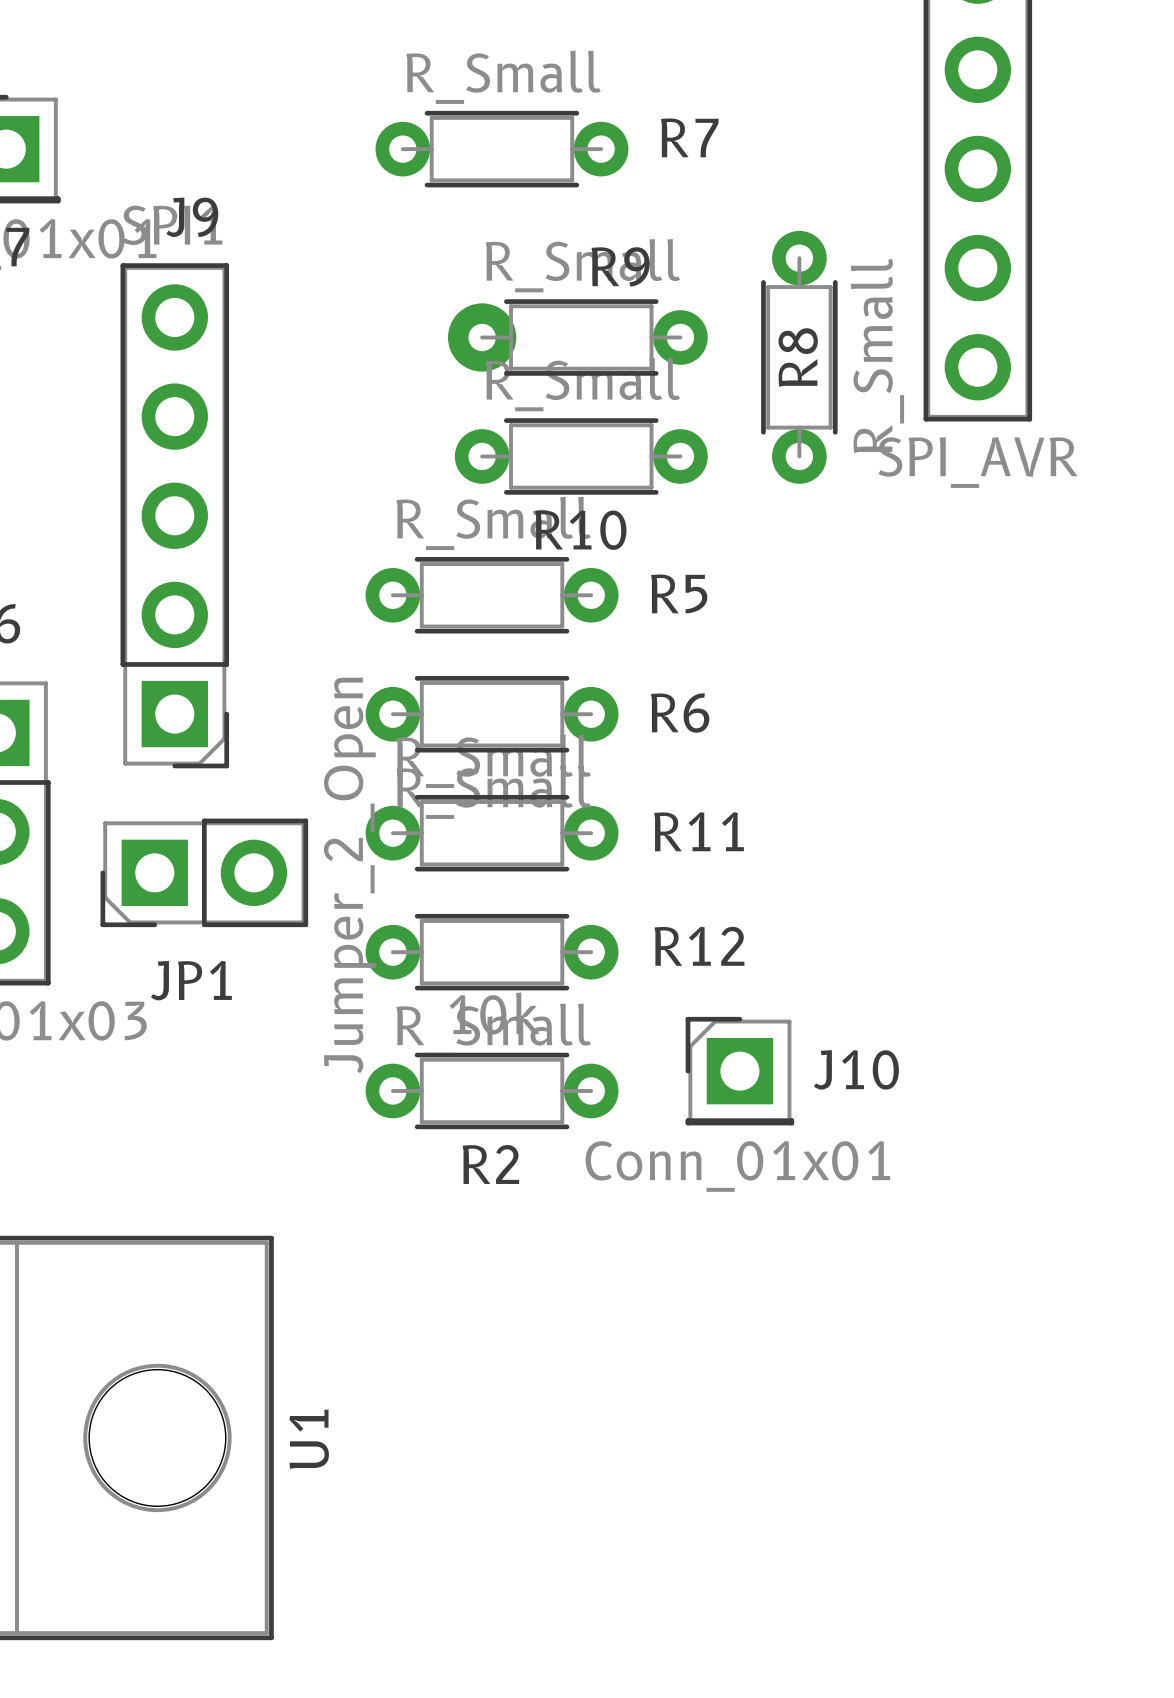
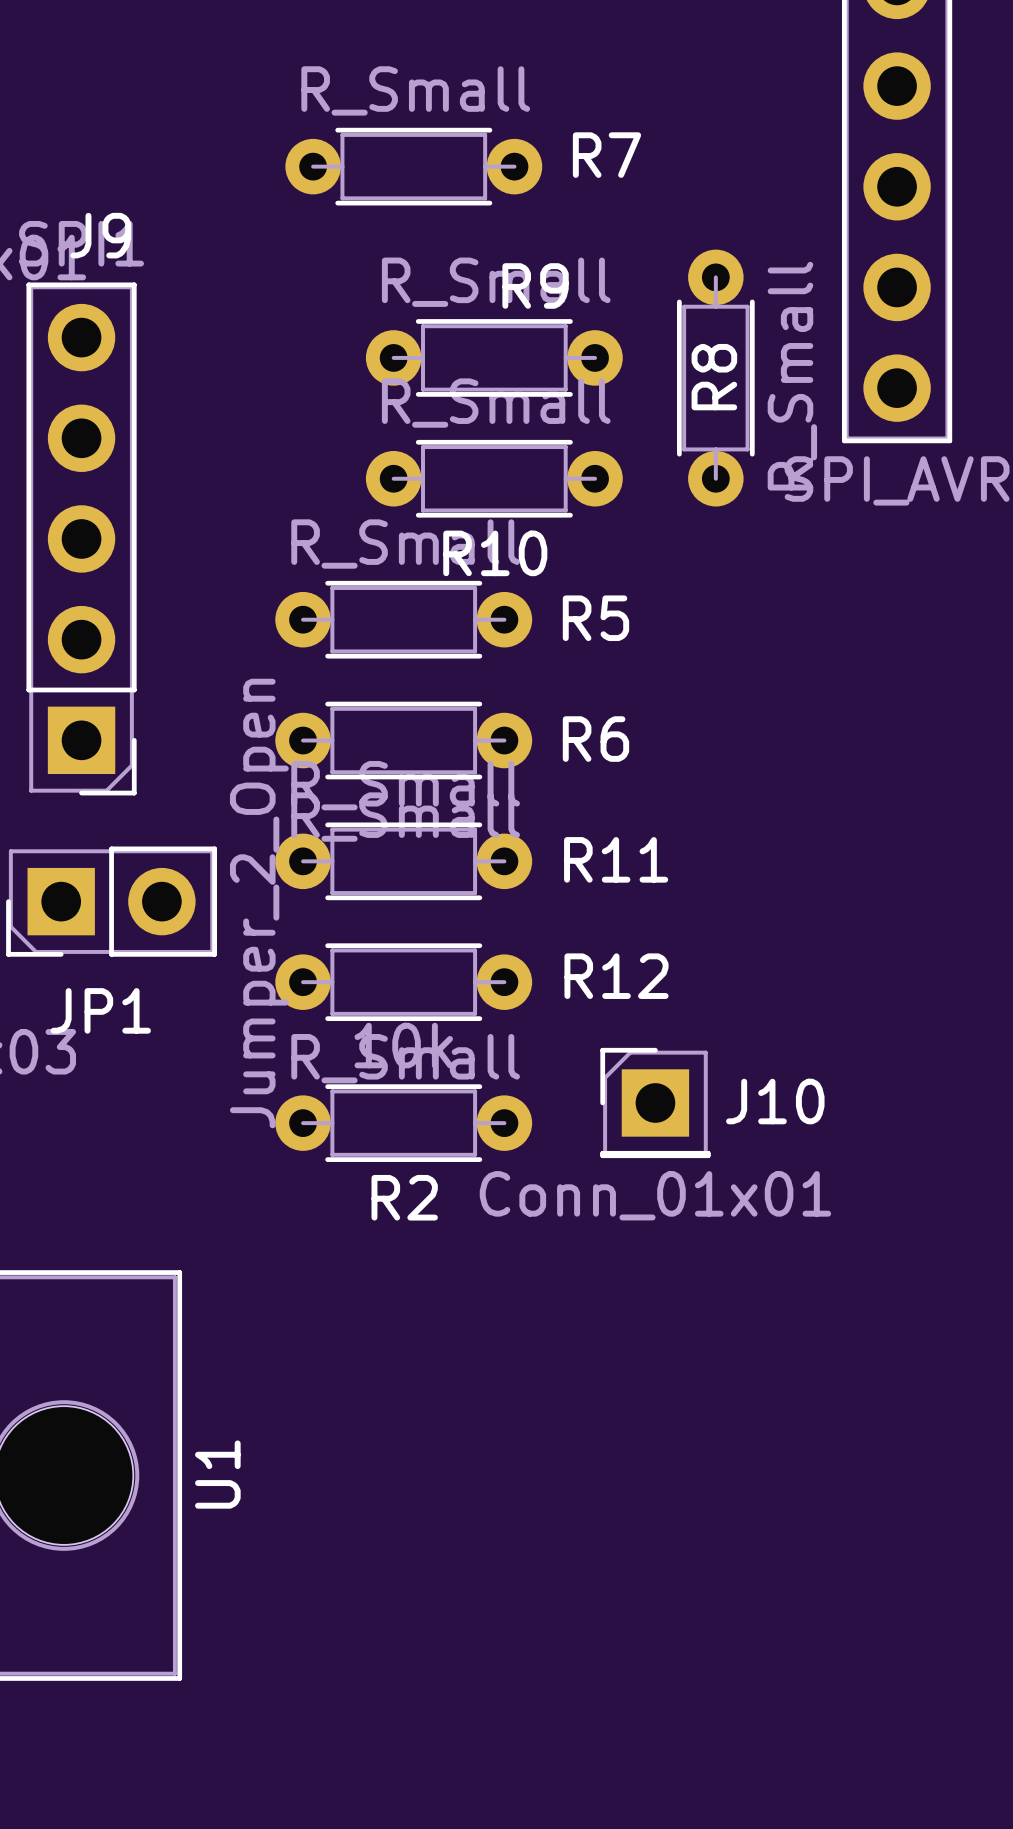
R9 footprint: [447, 299, 708, 376] -> [365, 319, 623, 397]

